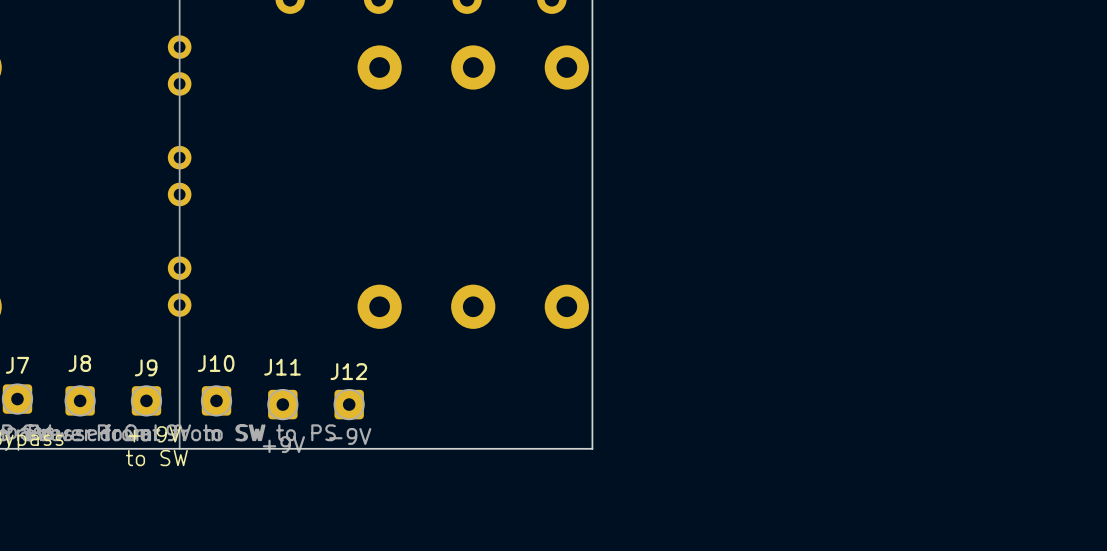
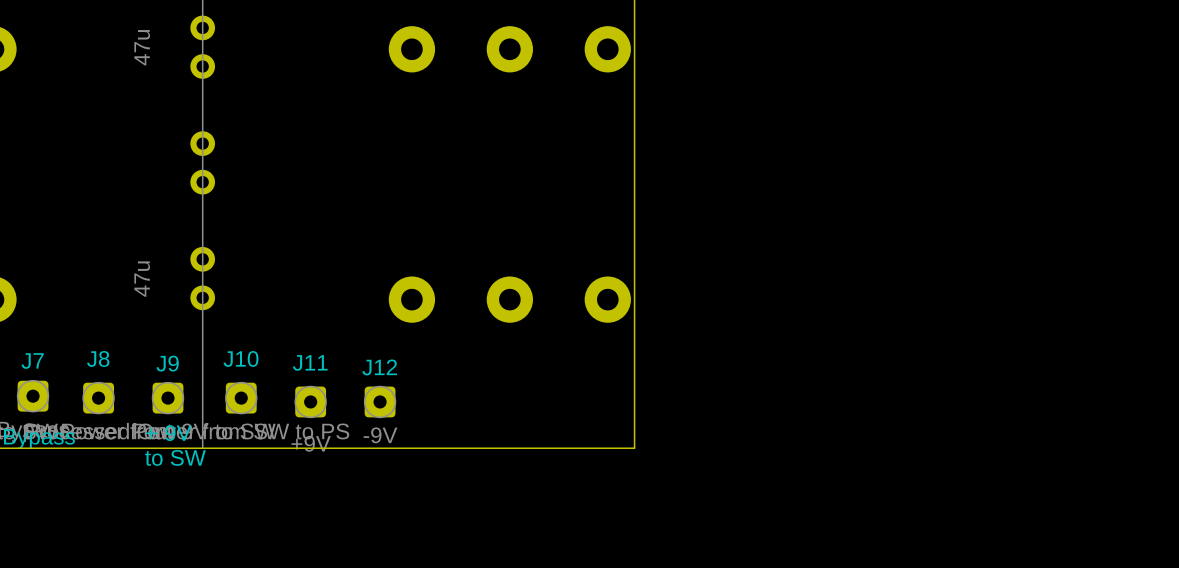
part value: none -> 47u (142, 47)
part value: none -> 47u (142, 279)

